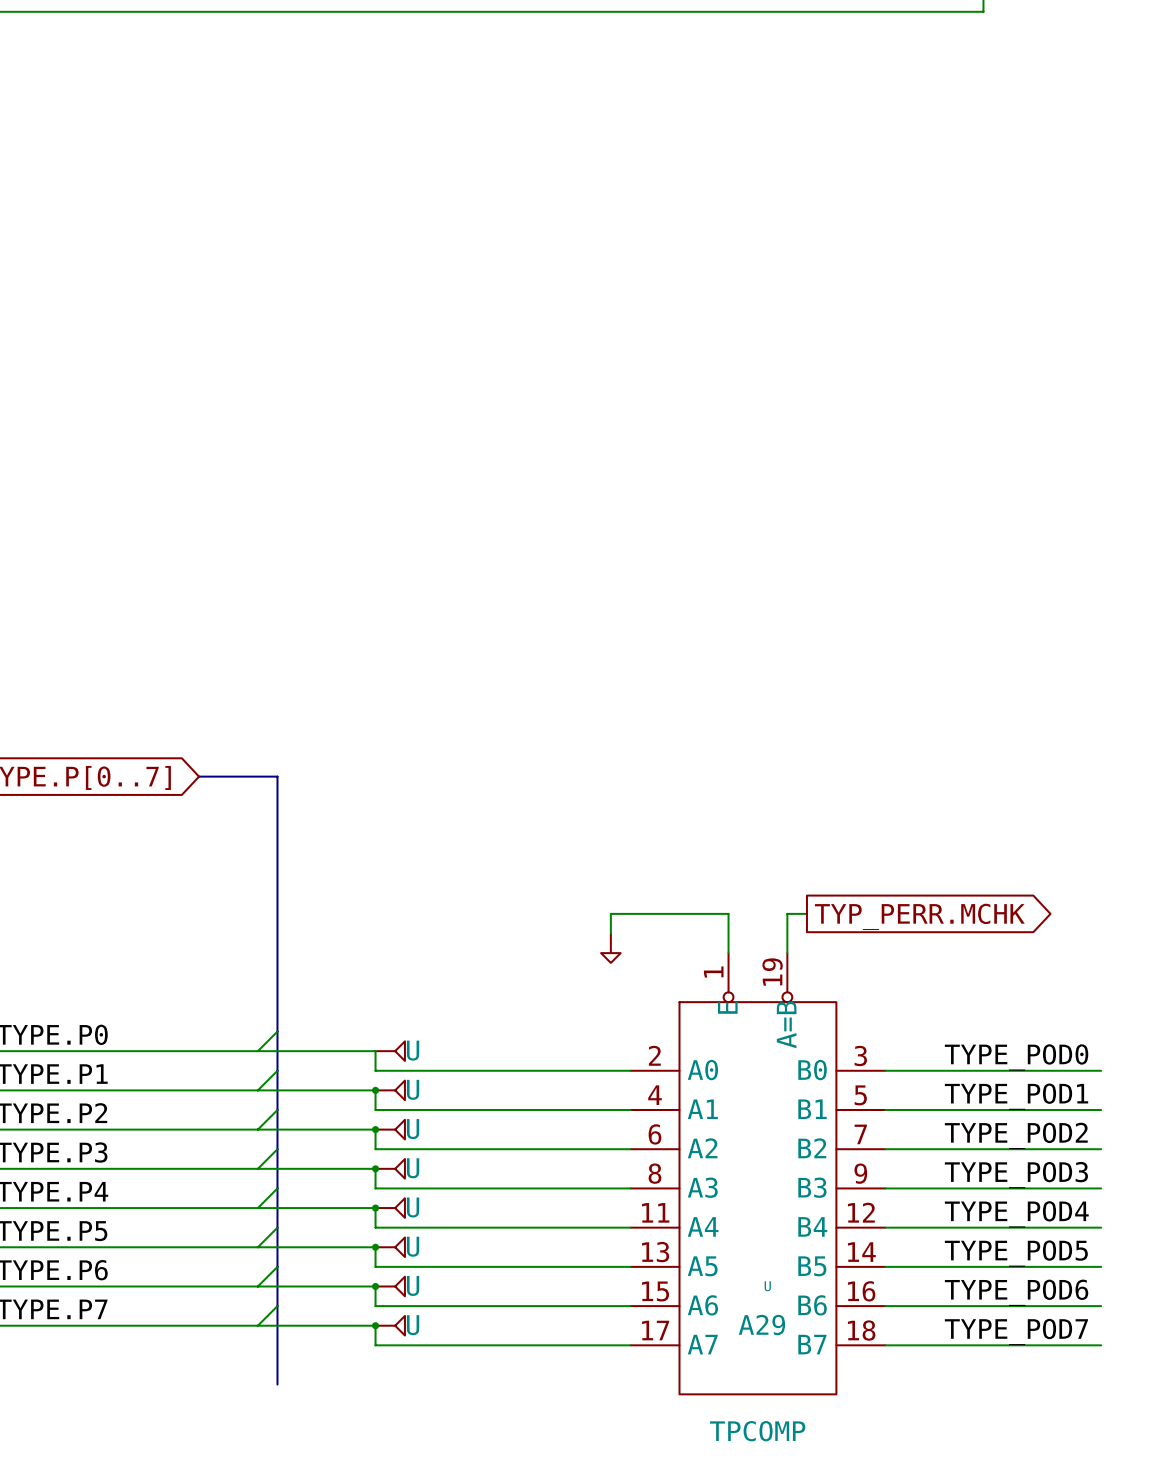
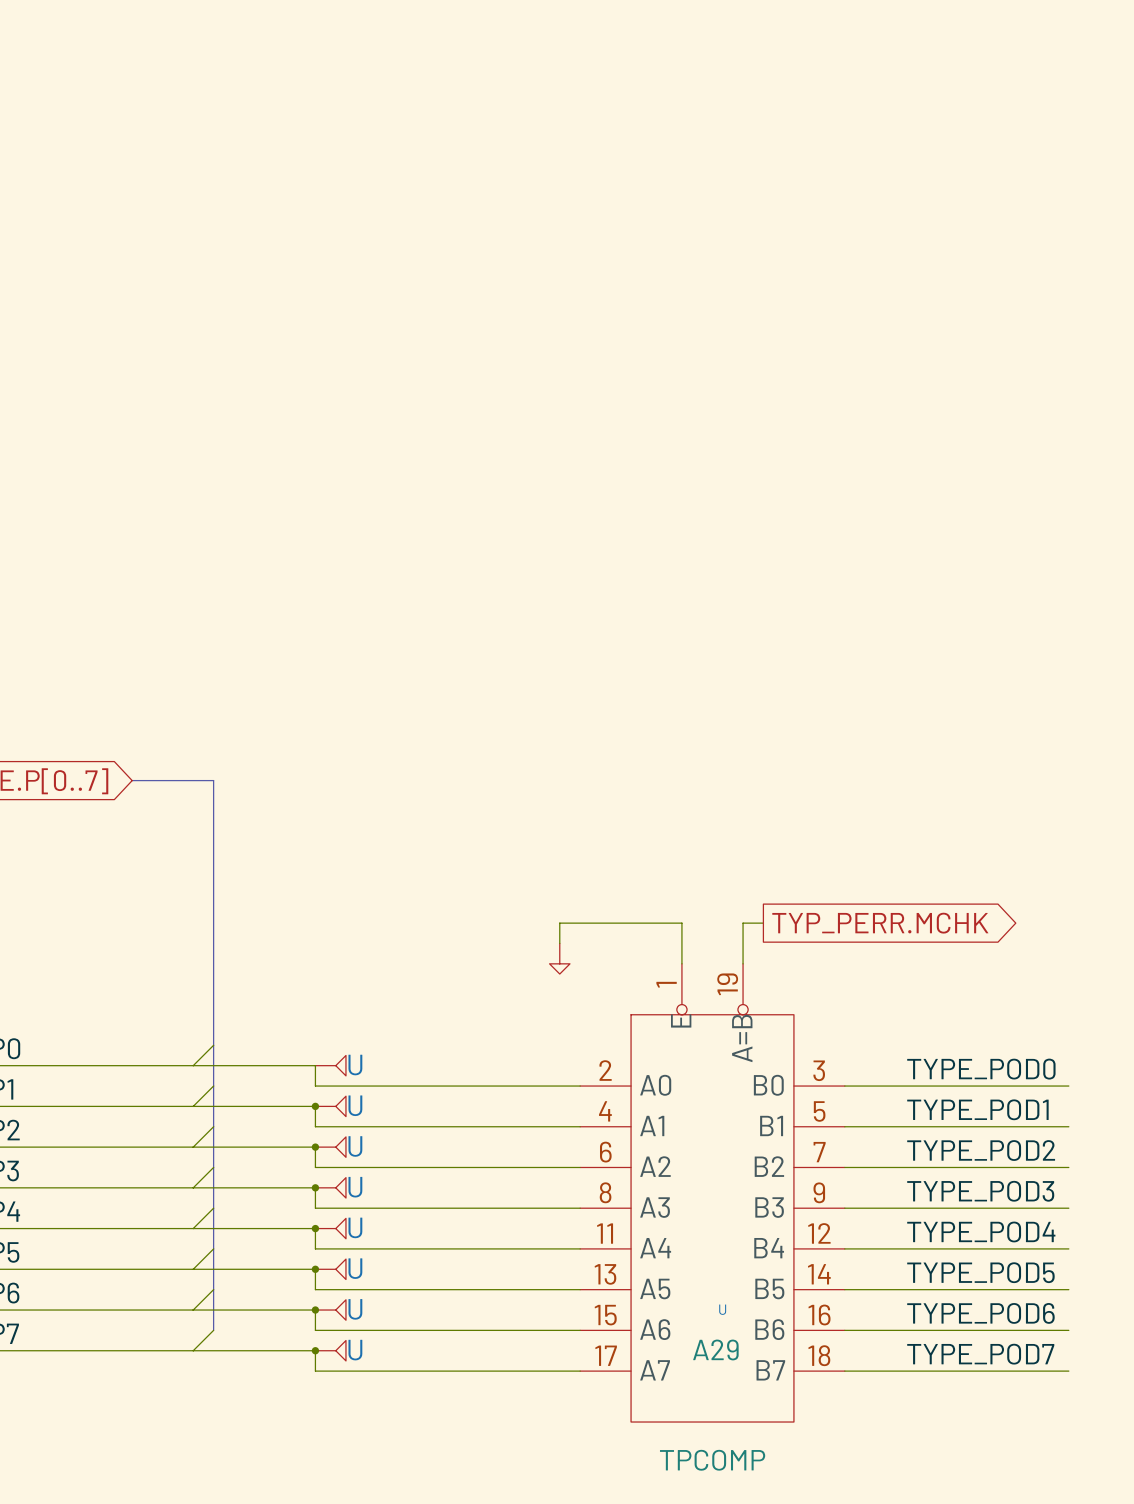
bus: (277, 1306) (277, 1384) -> none

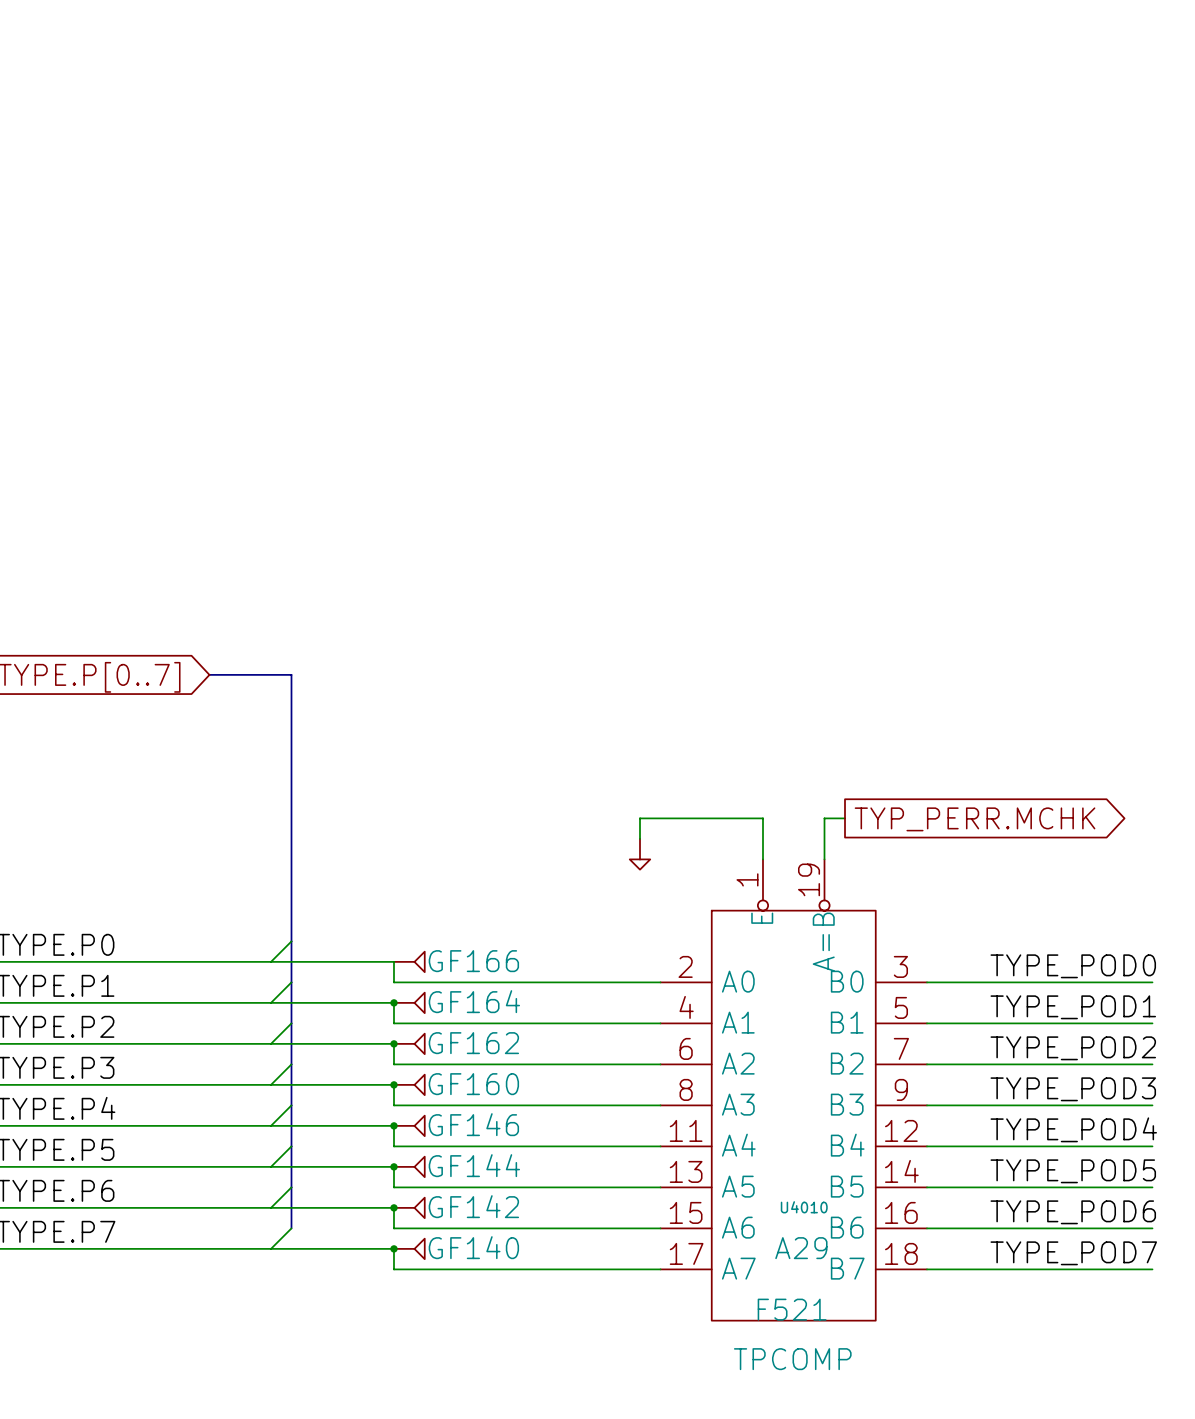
U name: U (355, 1065) -> GF166 (473, 961)
U name: U (355, 1105) -> GF164 (474, 1001)
U name: U (355, 1146) -> GF162 (473, 1043)
U name: U (355, 1187) -> GF160 (473, 1084)
U name: U (355, 1227) -> GF146 (473, 1124)
U name: U (355, 1268) -> GF144 (474, 1165)
U name: U (355, 1309) -> GF142 (473, 1206)
U name: U (722, 1309) -> U4010 (804, 1207)
U name: U (355, 1350) -> GF140 (473, 1247)
U value: none -> F521 (792, 1309)

